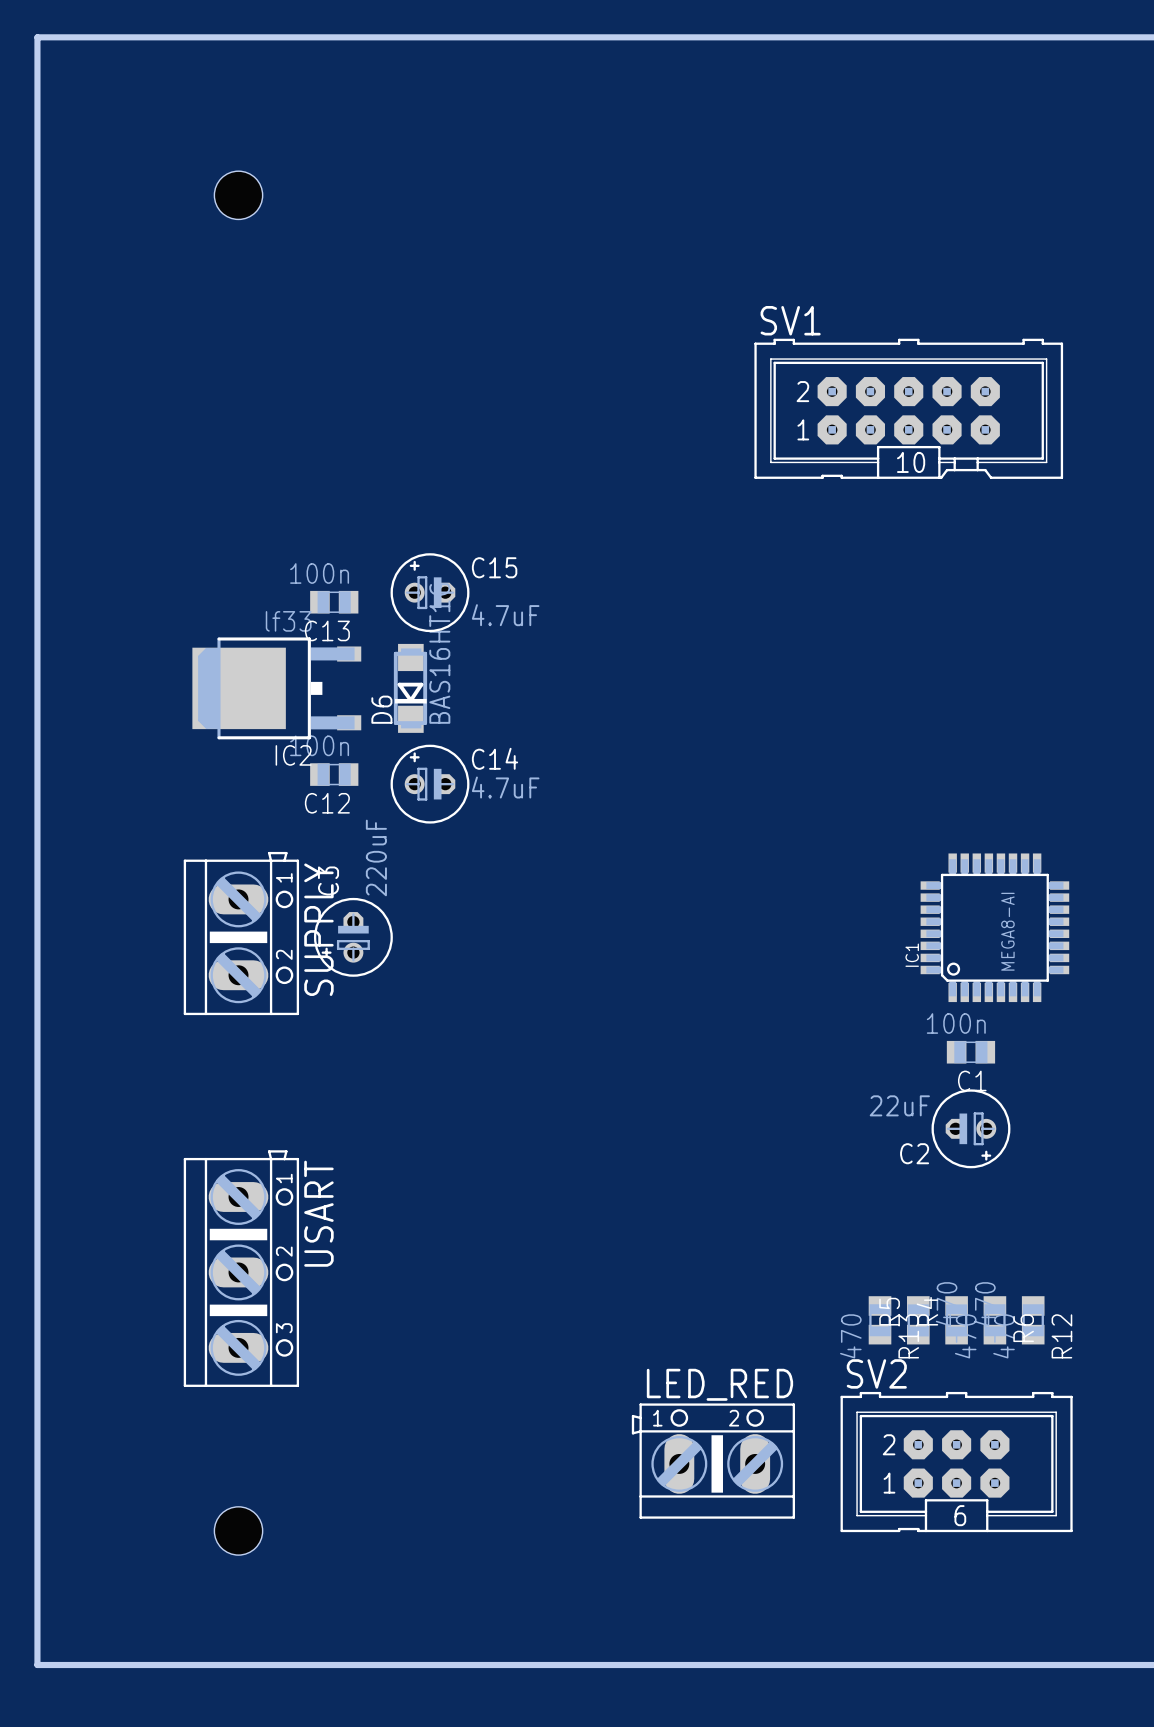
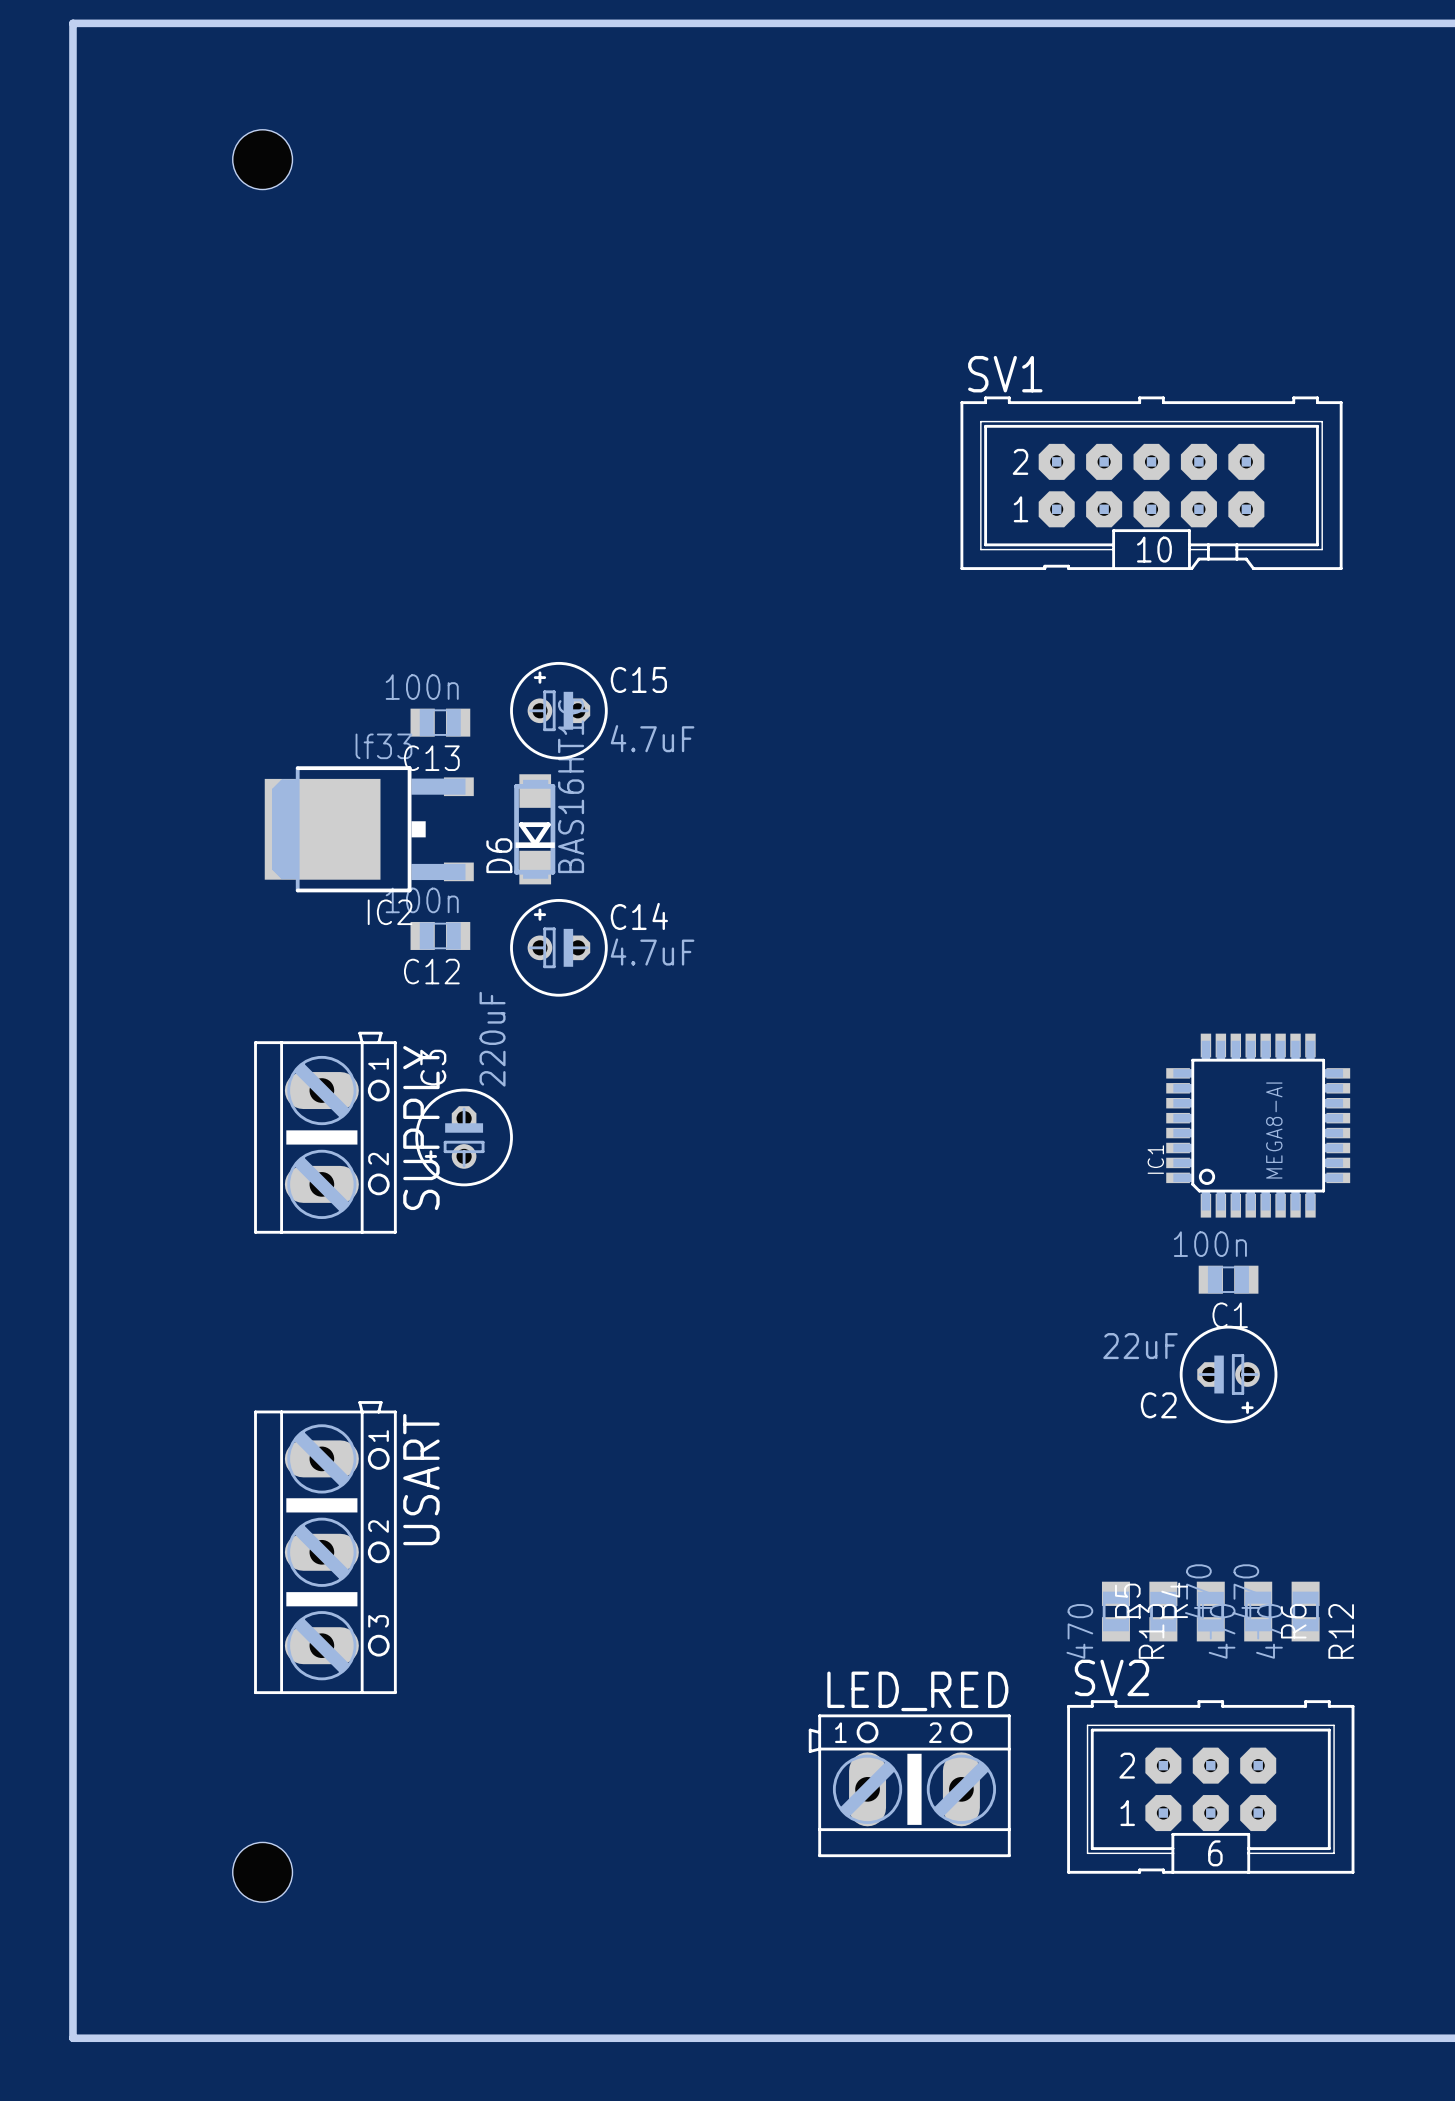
hole position: (238, 195) -> (262, 159)
hole position: (238, 1530) -> (262, 1872)

